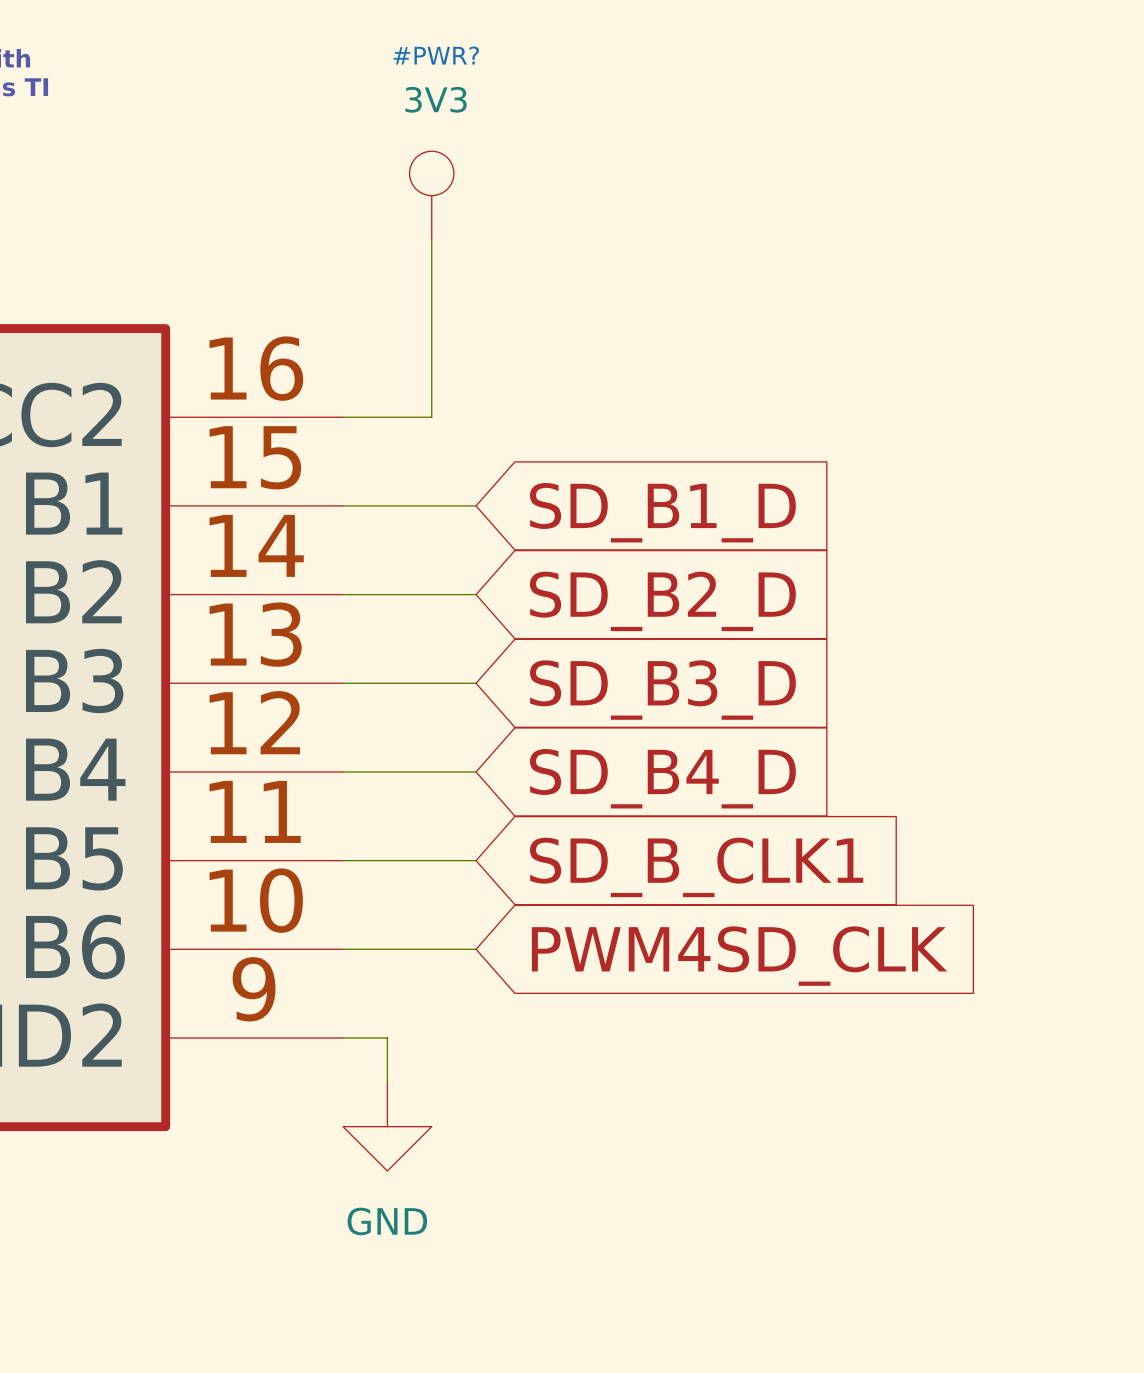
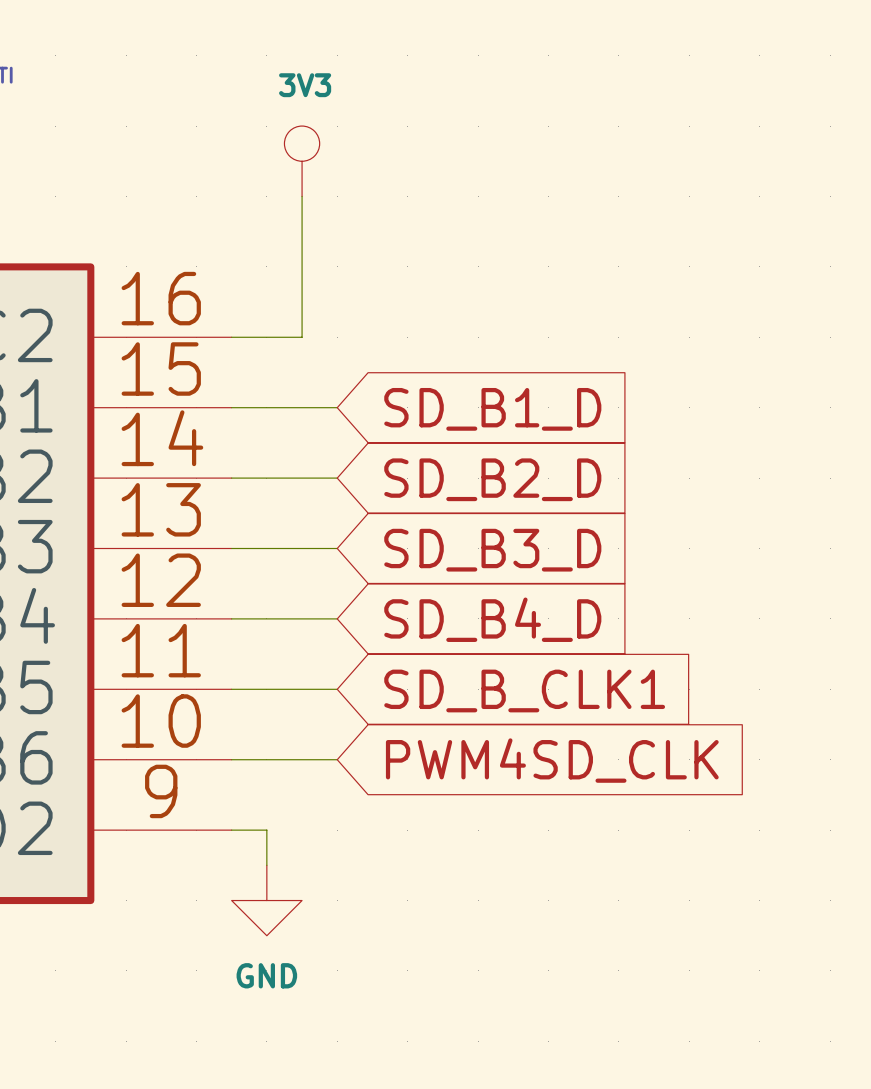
#PWR? name: #PWR? (436, 55) -> none

